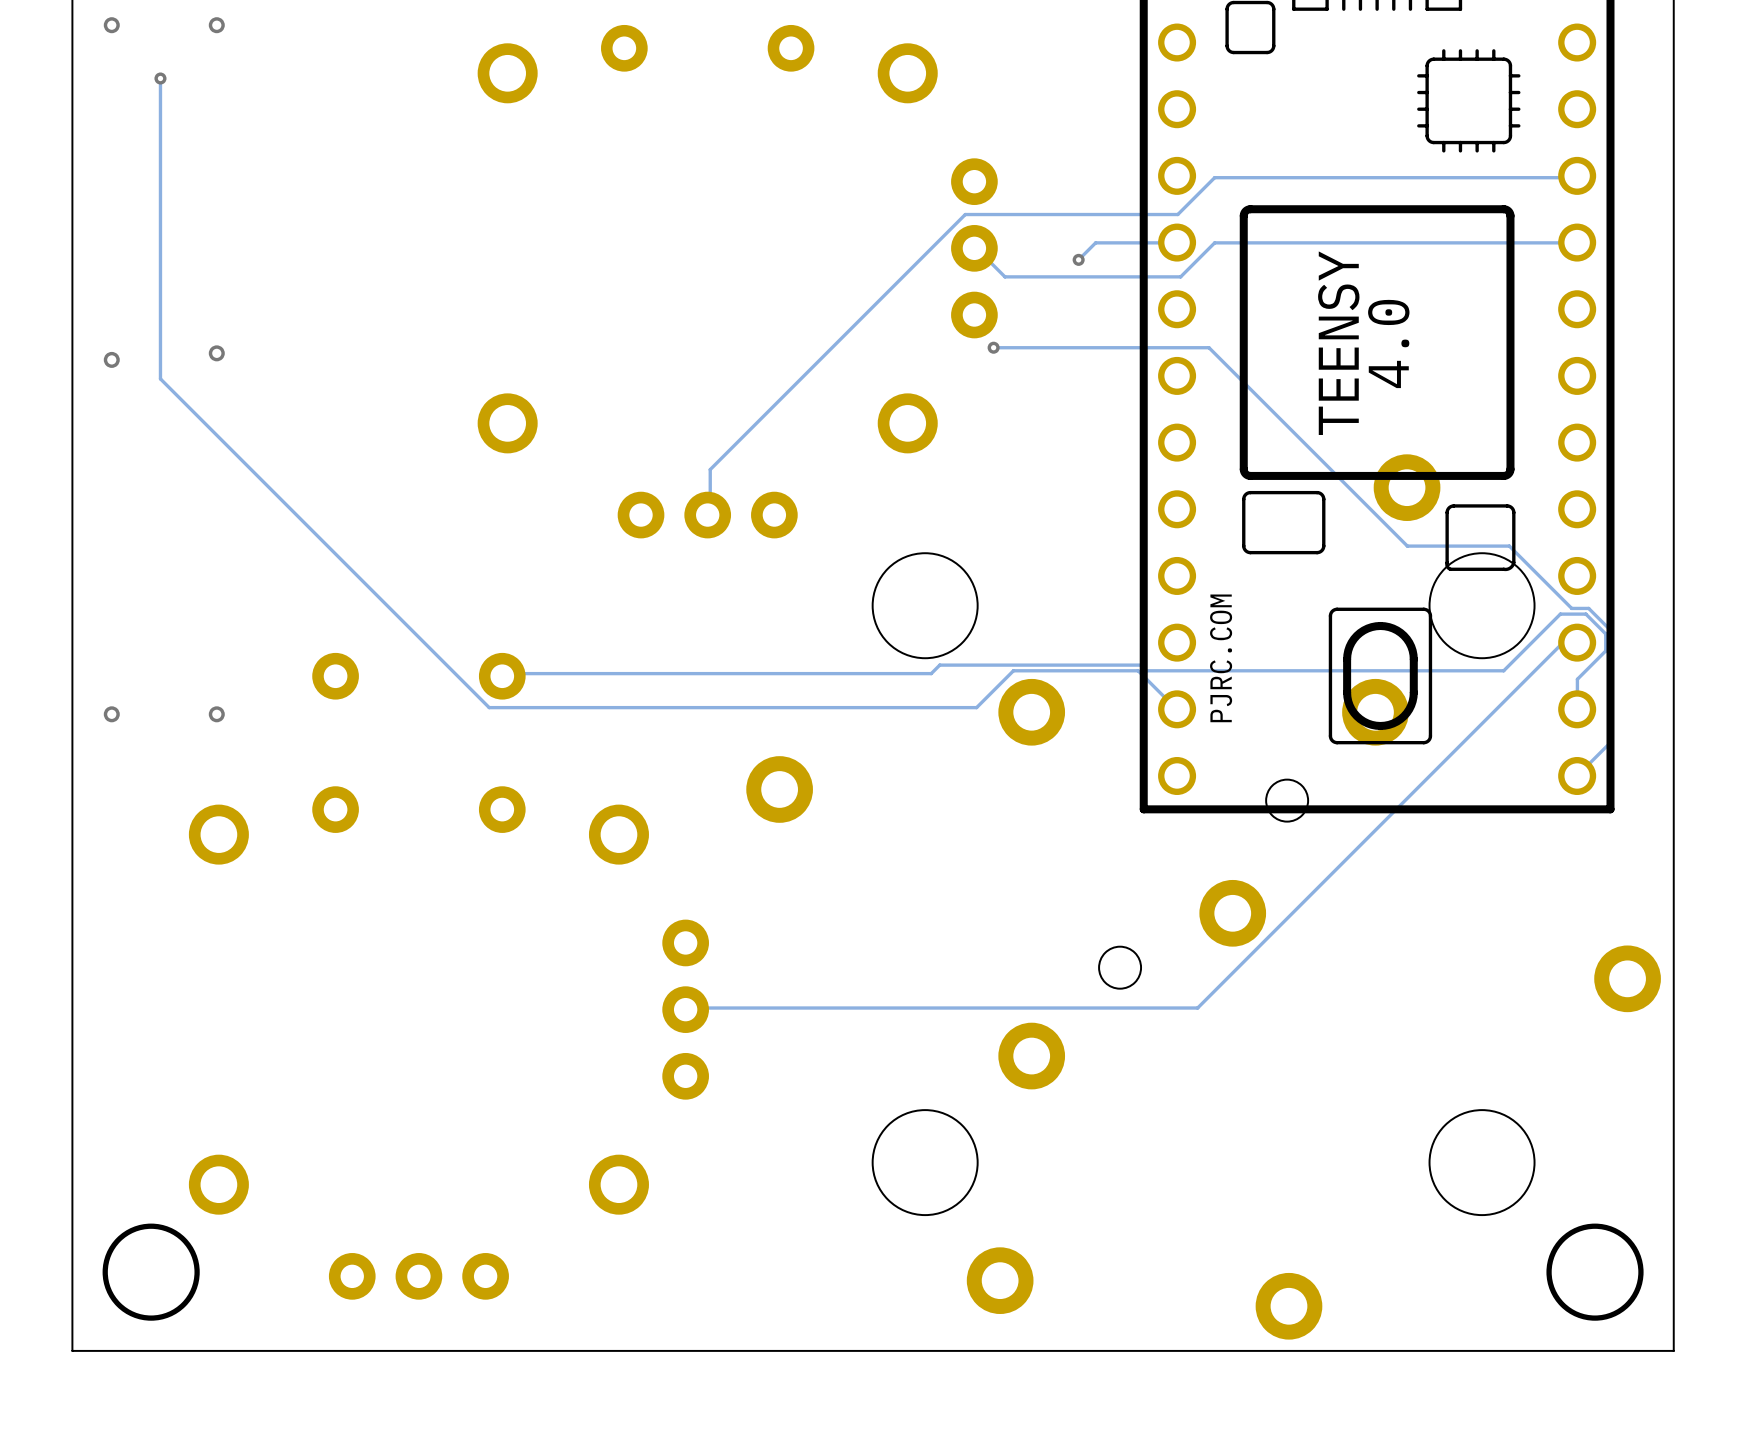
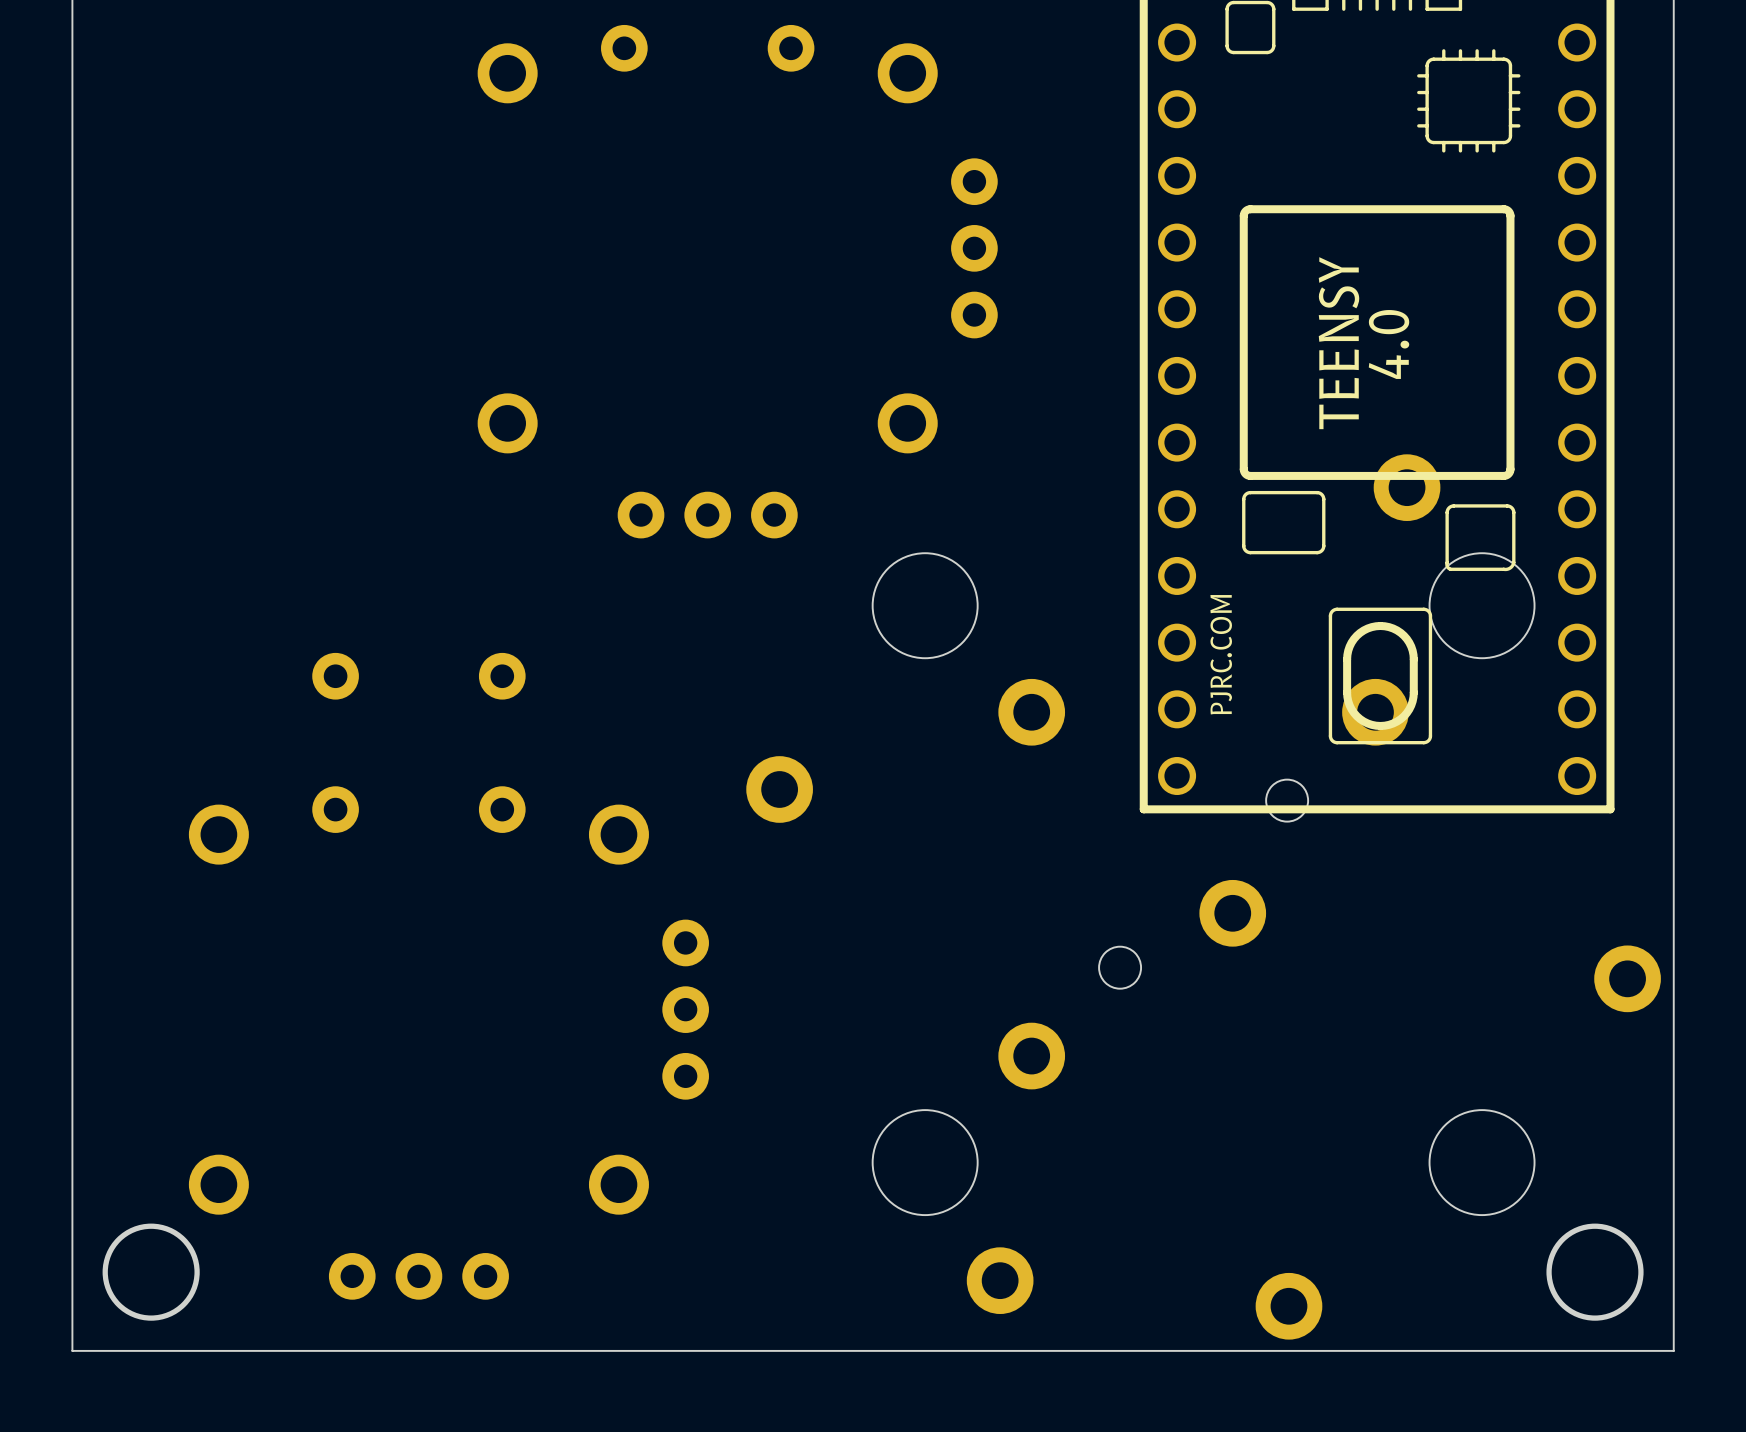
via: (111, 25) -> none
via: (216, 25) -> none
track: (160, 78) (160, 378) (489, 707) (976, 707) (1013, 670) (1138, 670) (1177, 709) -> none
via: (160, 78) -> none
track: (1577, 175) (1574, 177) (1214, 177) (1177, 214) (965, 214) (710, 469) (710, 514) (707, 515) -> none
track: (1177, 242) (1095, 242) (1078, 259) -> none
track: (1577, 242) (1214, 242) (1180, 276) (1004, 276) (974, 248) -> none
via: (1078, 259) -> none
track: (993, 347) (1209, 347) (1407, 546) (1509, 546) (1571, 608) (1588, 608) (1611, 631) (1611, 741) (1577, 775) -> none
via: (993, 347) -> none
via: (216, 353) -> none
via: (111, 359) -> none
track: (1577, 642) (1574, 645) (1560, 645) (1197, 1008) (687, 1008) (685, 1009) -> none
track: (502, 676) (503, 673) (931, 673) (939, 665) (1140, 665) (1146, 670) (1503, 670) (1560, 614) (1585, 614) (1605, 633) (1605, 650) (1577, 679) (1577, 709) -> none
via: (111, 714) -> none
via: (216, 714) -> none

